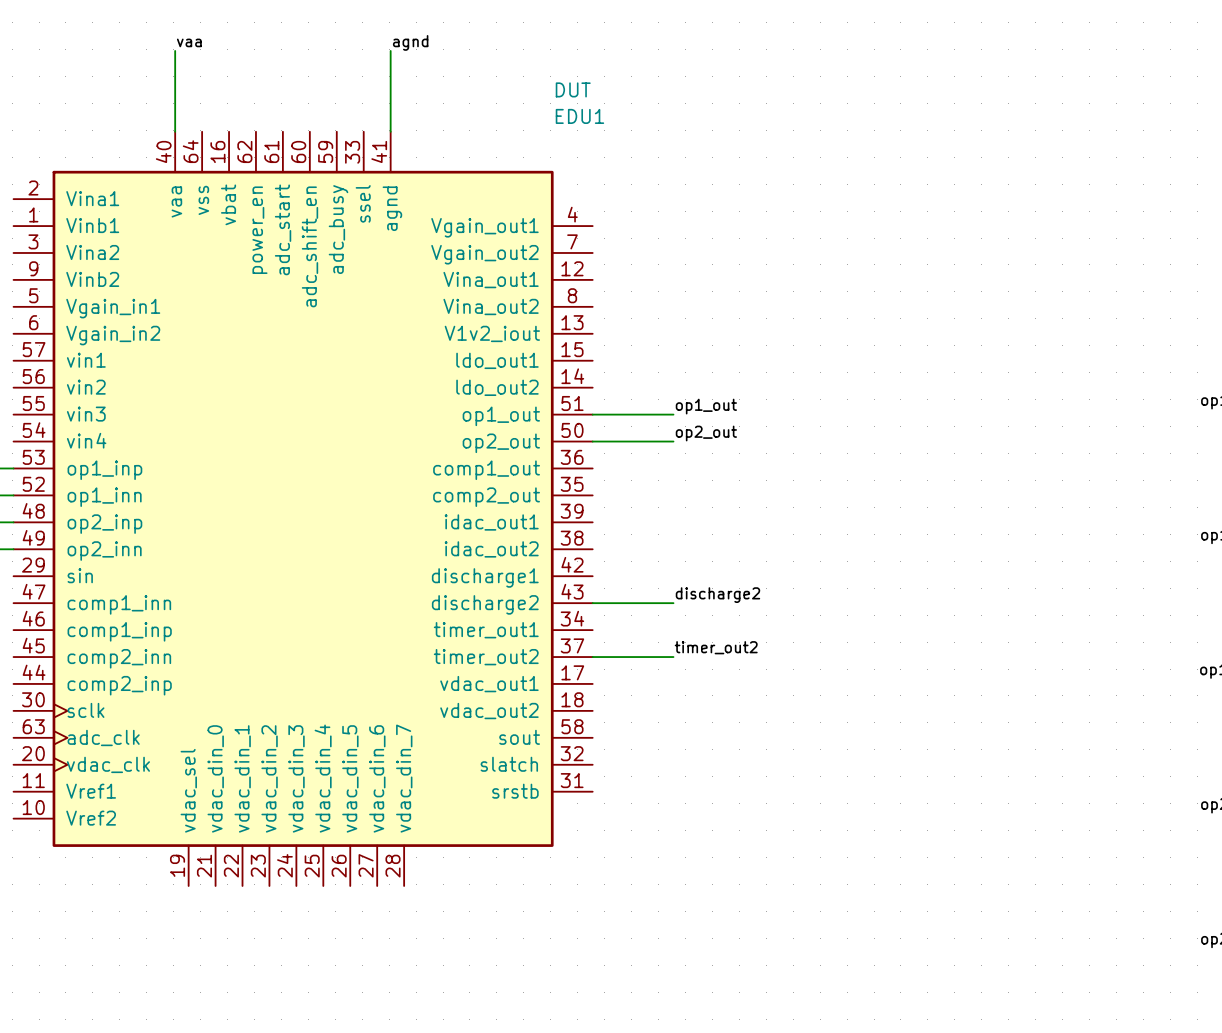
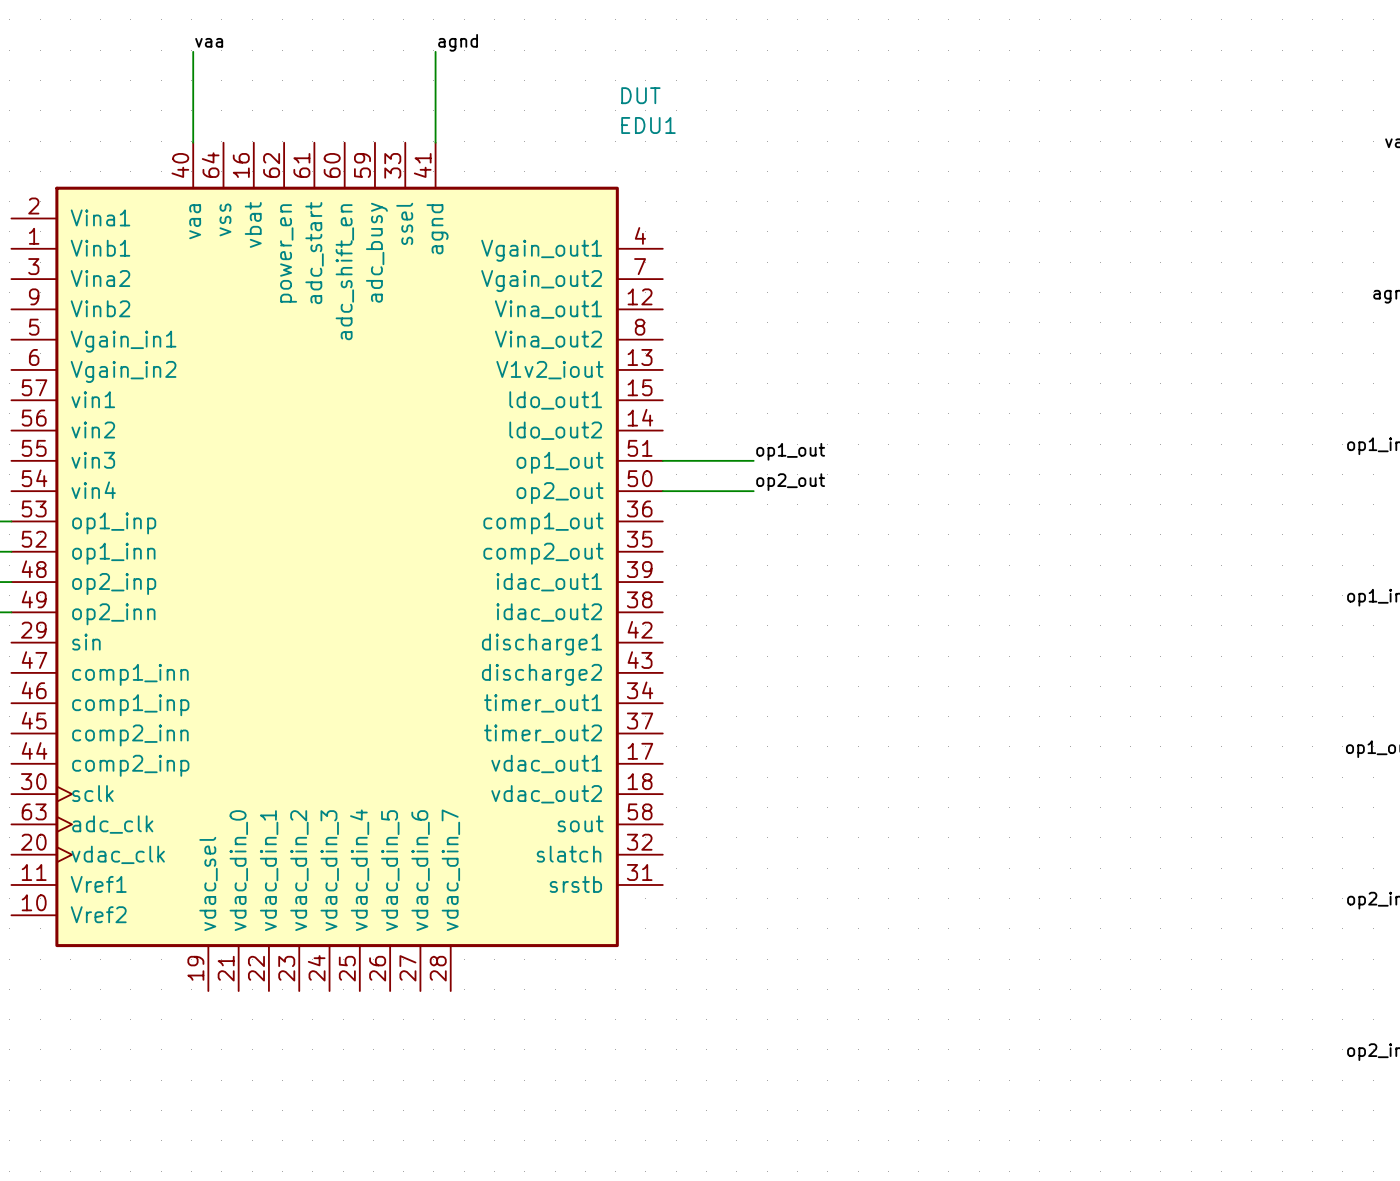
label: discharge2 (717, 595) -> none
wire: (592, 603) (673, 603) -> none
label: timer_out2 (716, 647) -> none
wire: (592, 657) (673, 657) -> none

